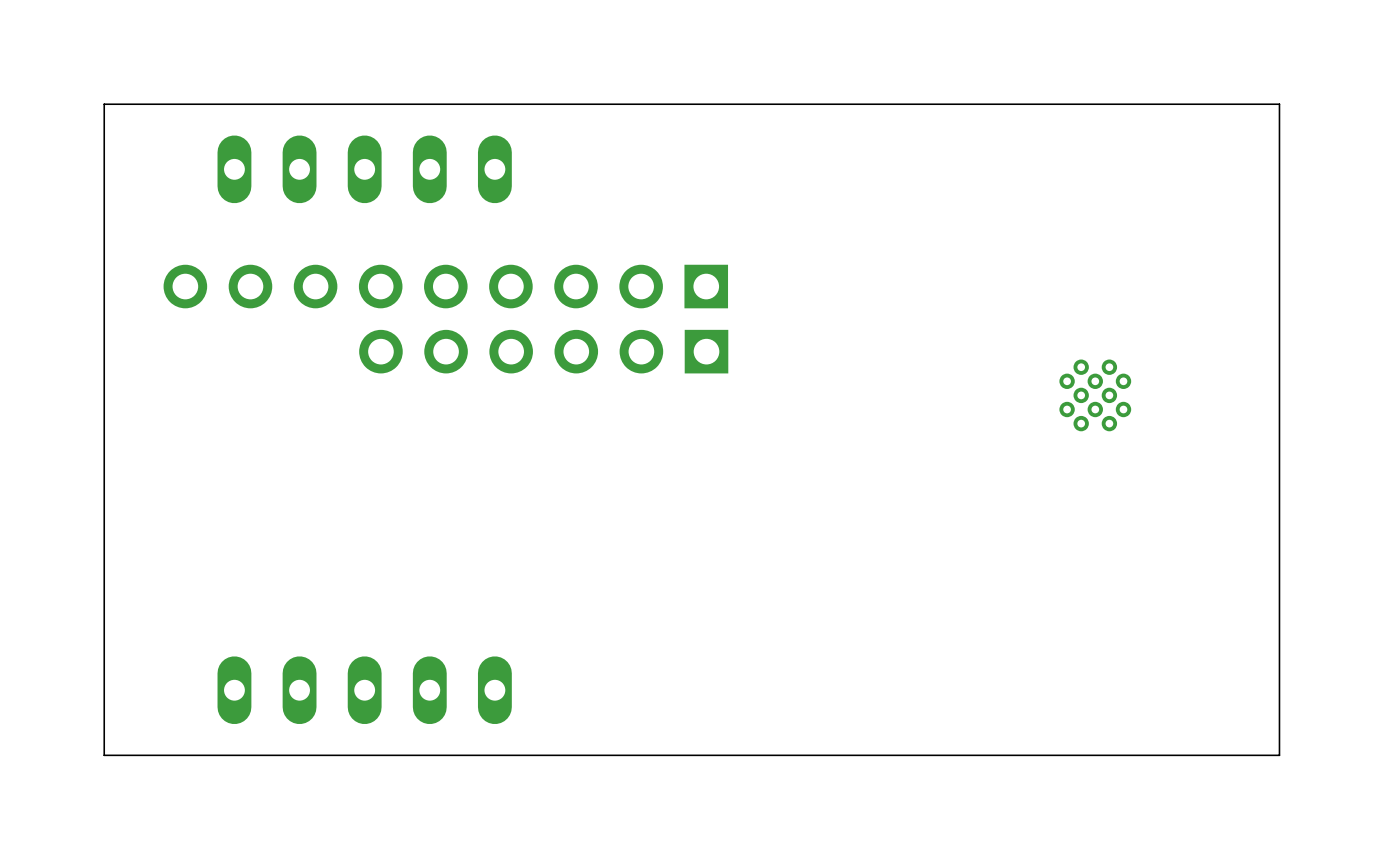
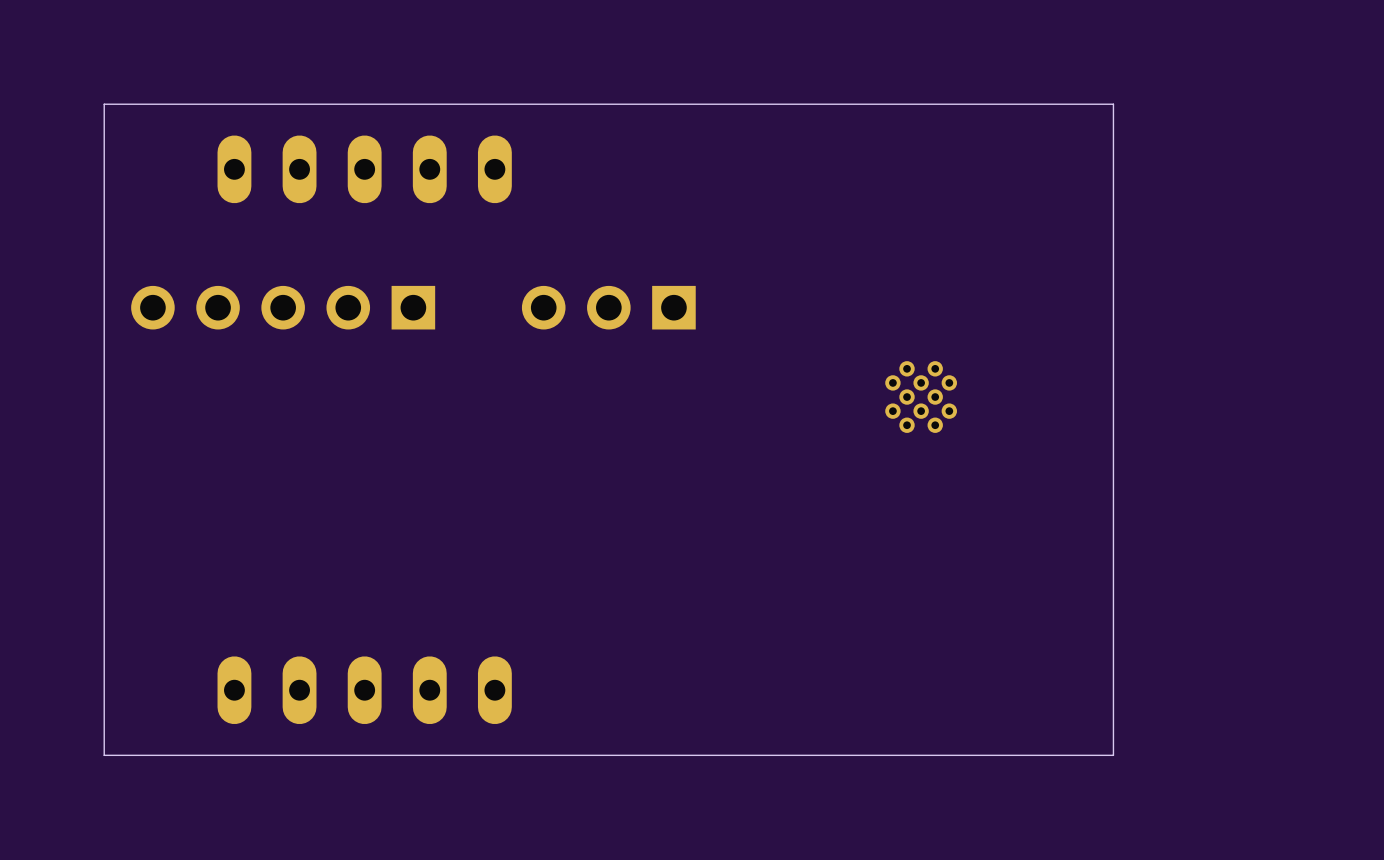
board edge: (1113, 104) (1279, 104) (1279, 755) (1113, 755) -> (1113, 104) (1113, 755)
part: (445, 286) -> none
part: none -> (283, 307)
part: none -> (608, 307)
part: (543, 351) -> none
part position: (1095, 395) -> (921, 397)

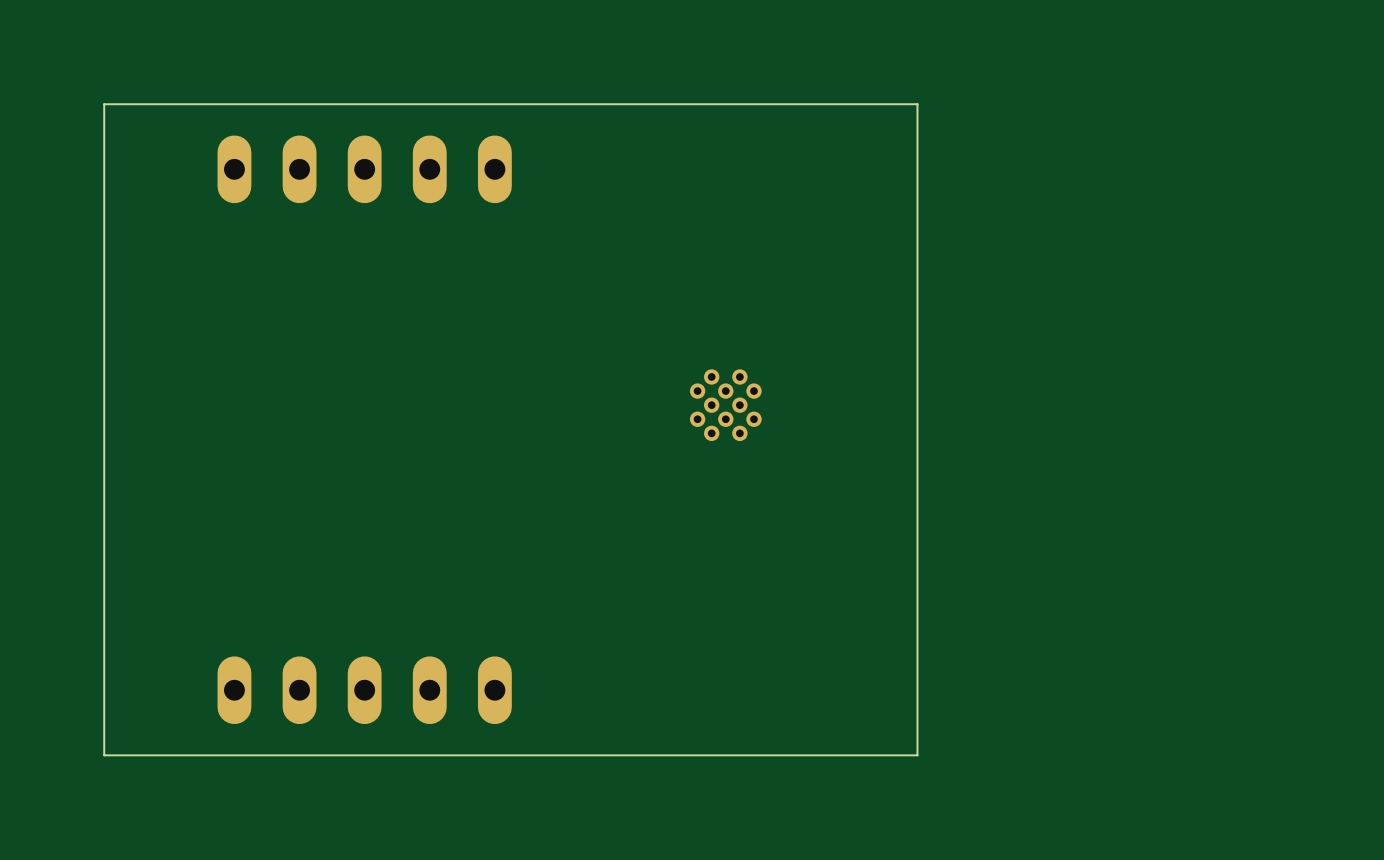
board edge: (917, 104) (1113, 104) (1113, 755) (917, 755) -> (917, 104) (917, 755)
part: (283, 307) -> none
part: (608, 307) -> none
part position: (921, 397) -> (725, 405)

